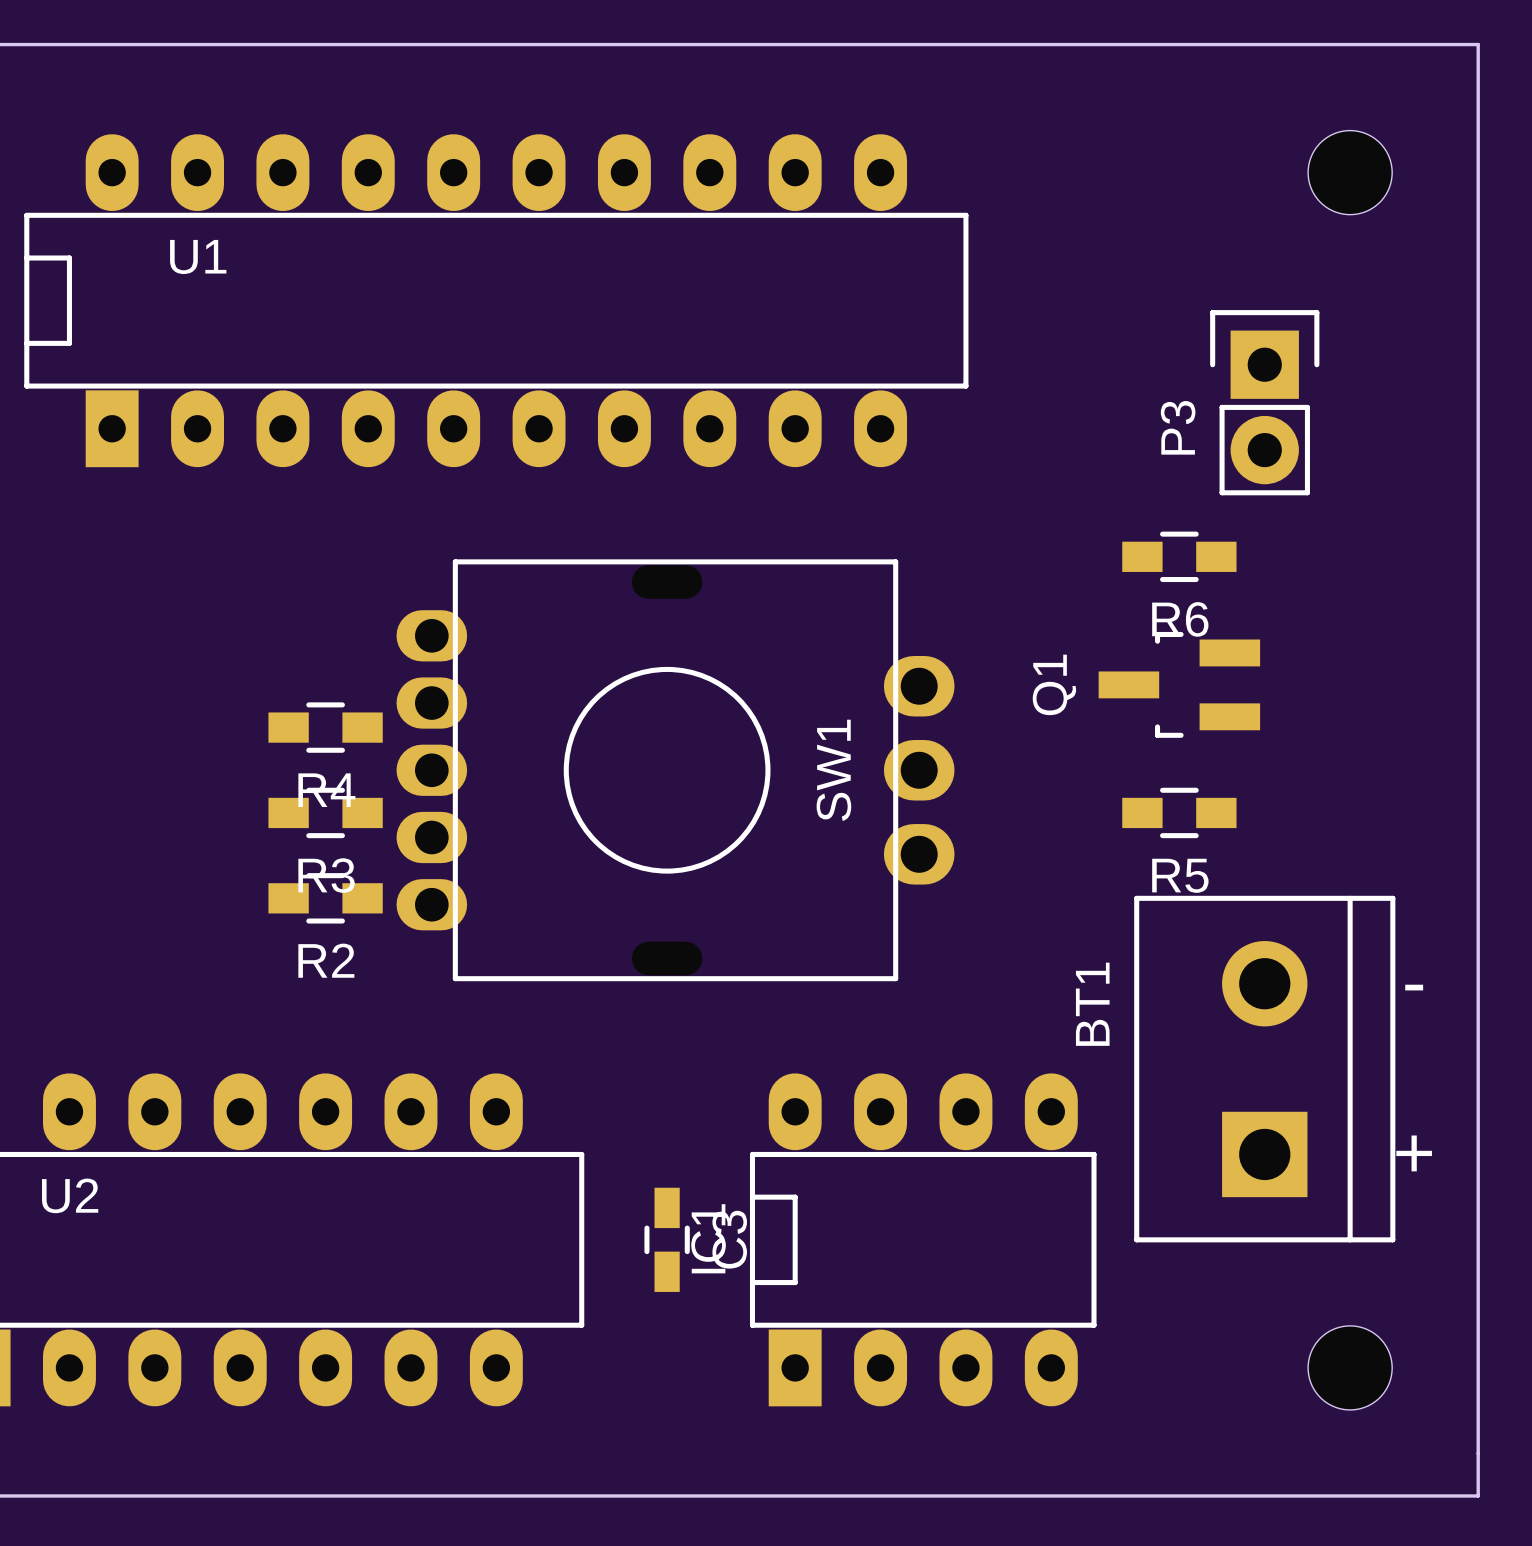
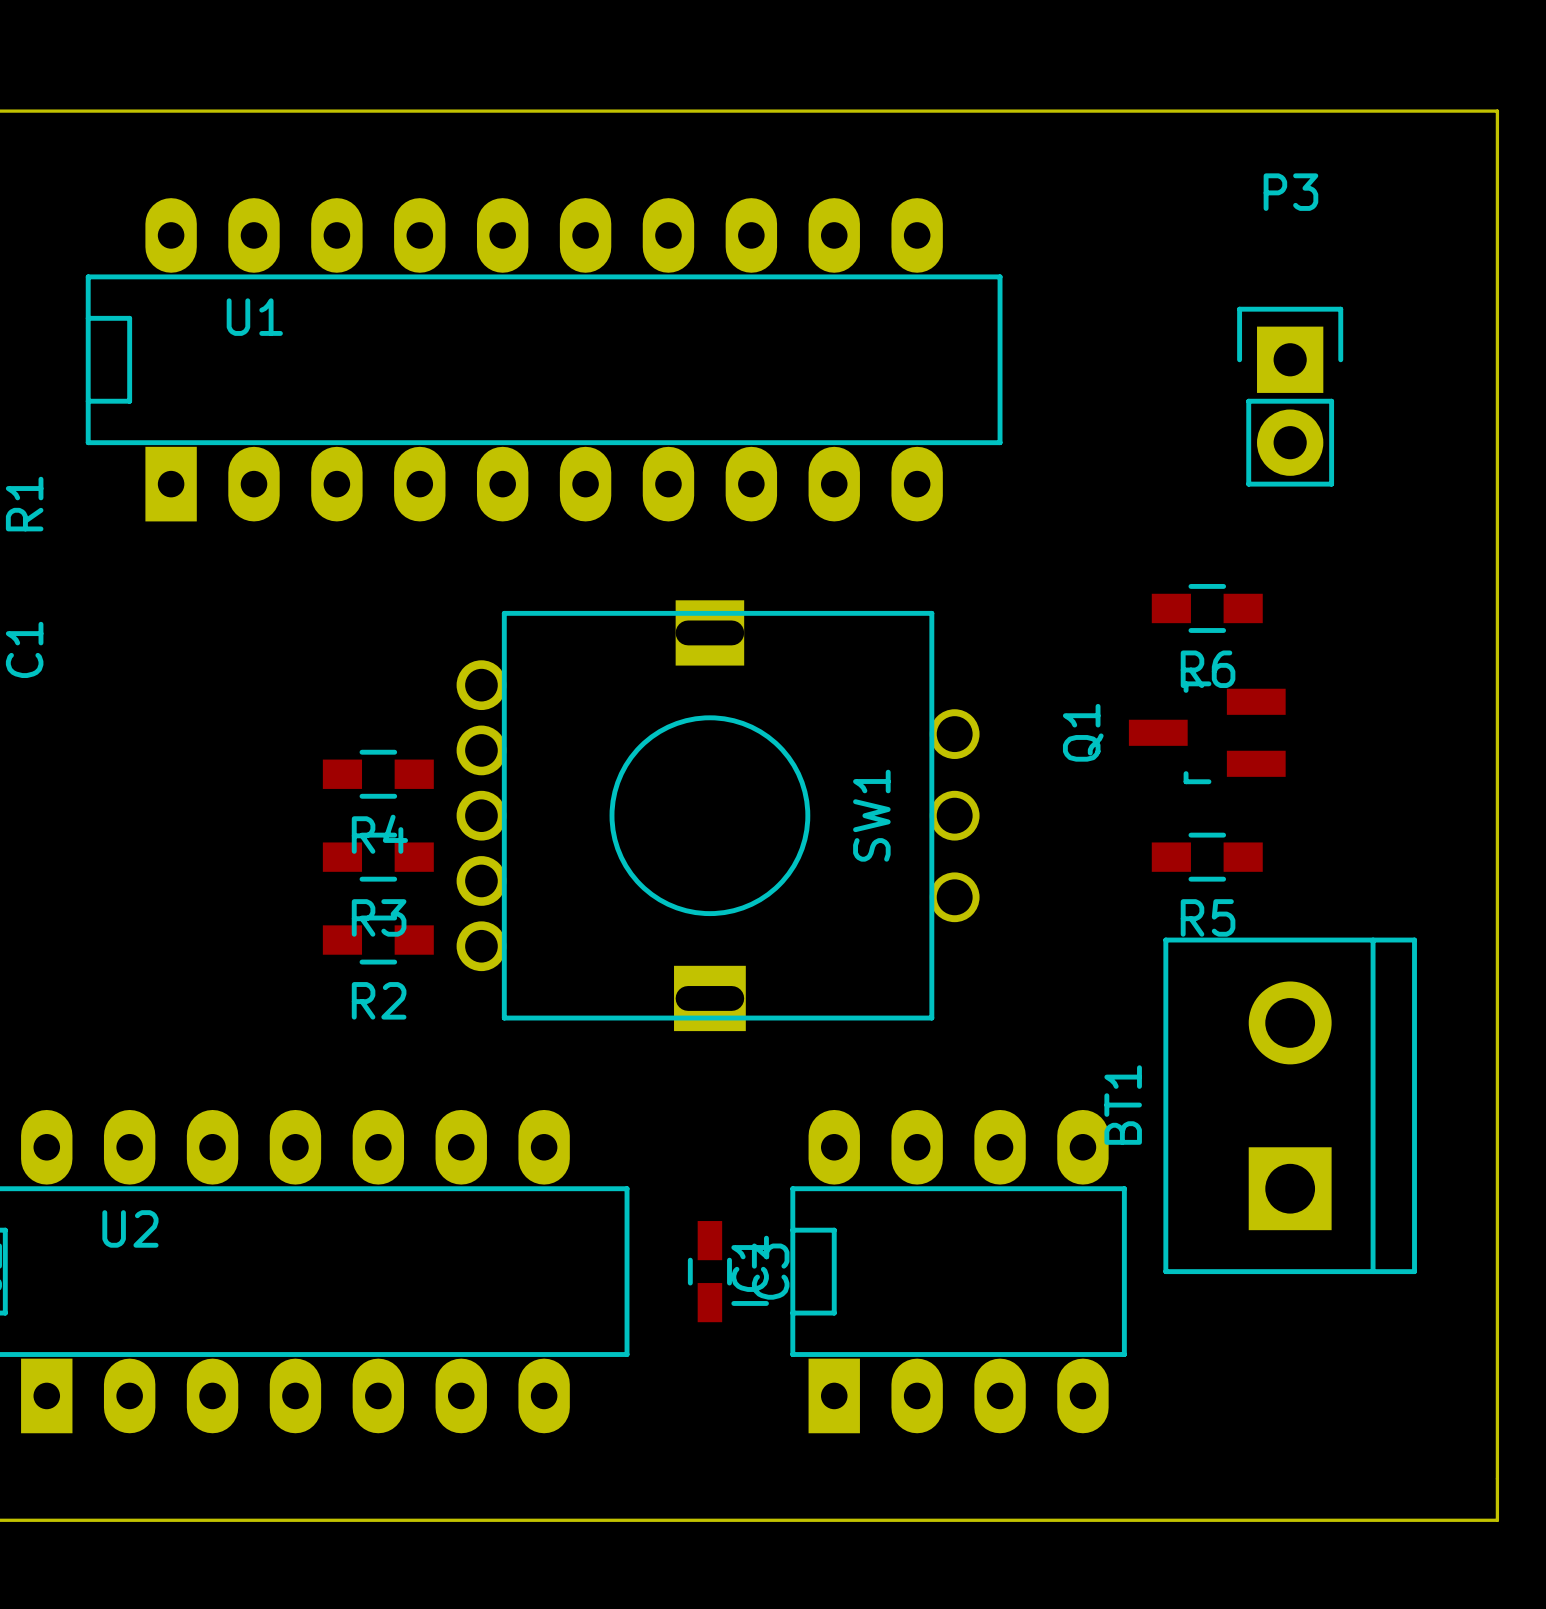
part: (1350, 172) -> none
P3 position: (1264, 402) -> (1290, 396)
P3 name rotation: 0° (1178, 427) -> 90° clockwise (1290, 192)
P3 name position: P3 (1178, 427) -> P3 (1290, 192)
SW1 footprint: [396, 559, 955, 982] -> [456, 600, 980, 1032]
text: - (1414, 987) -> none
BT1 name position: BT1 (1092, 1004) -> BT1 (1123, 1105)
text: + (1414, 1153) -> none
part: (1350, 1367) -> none

